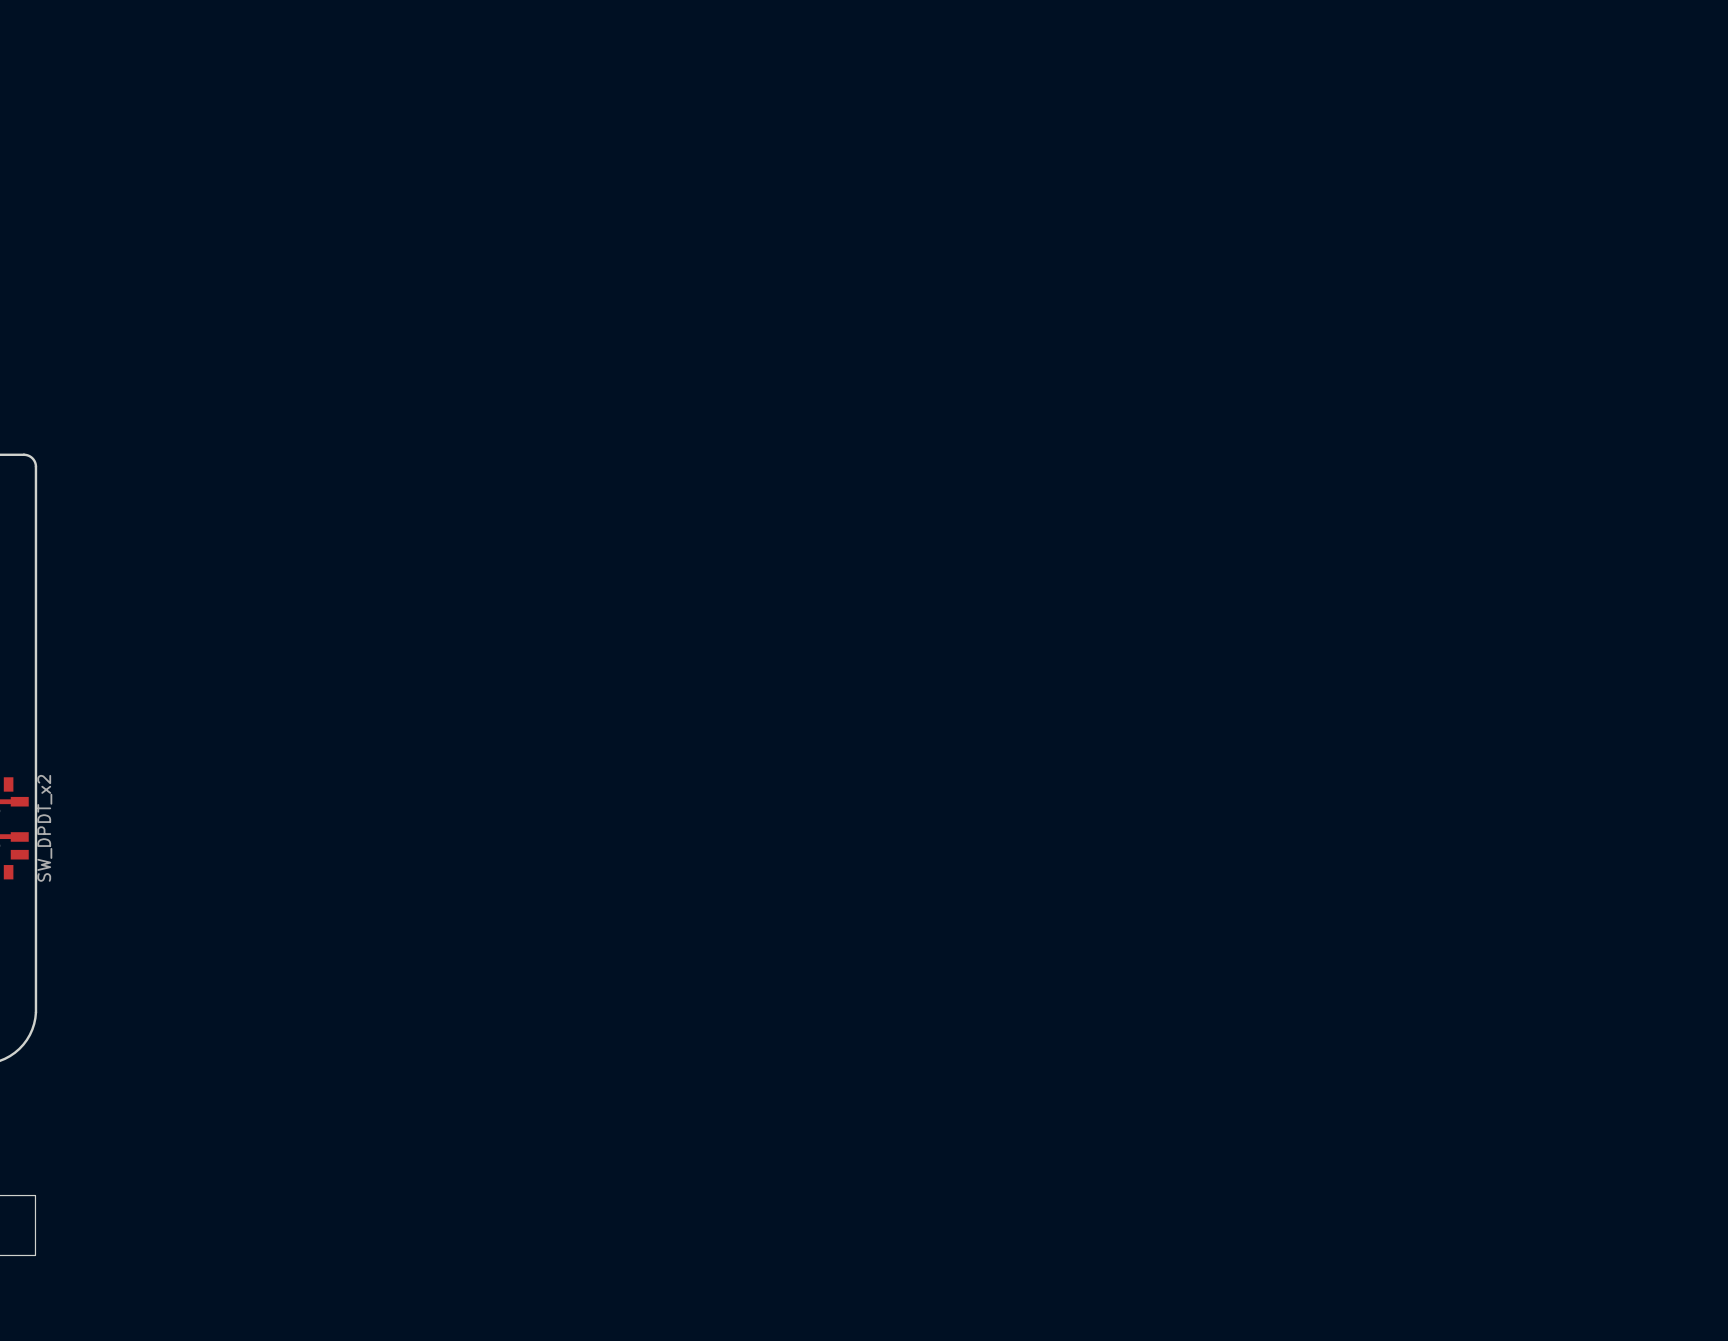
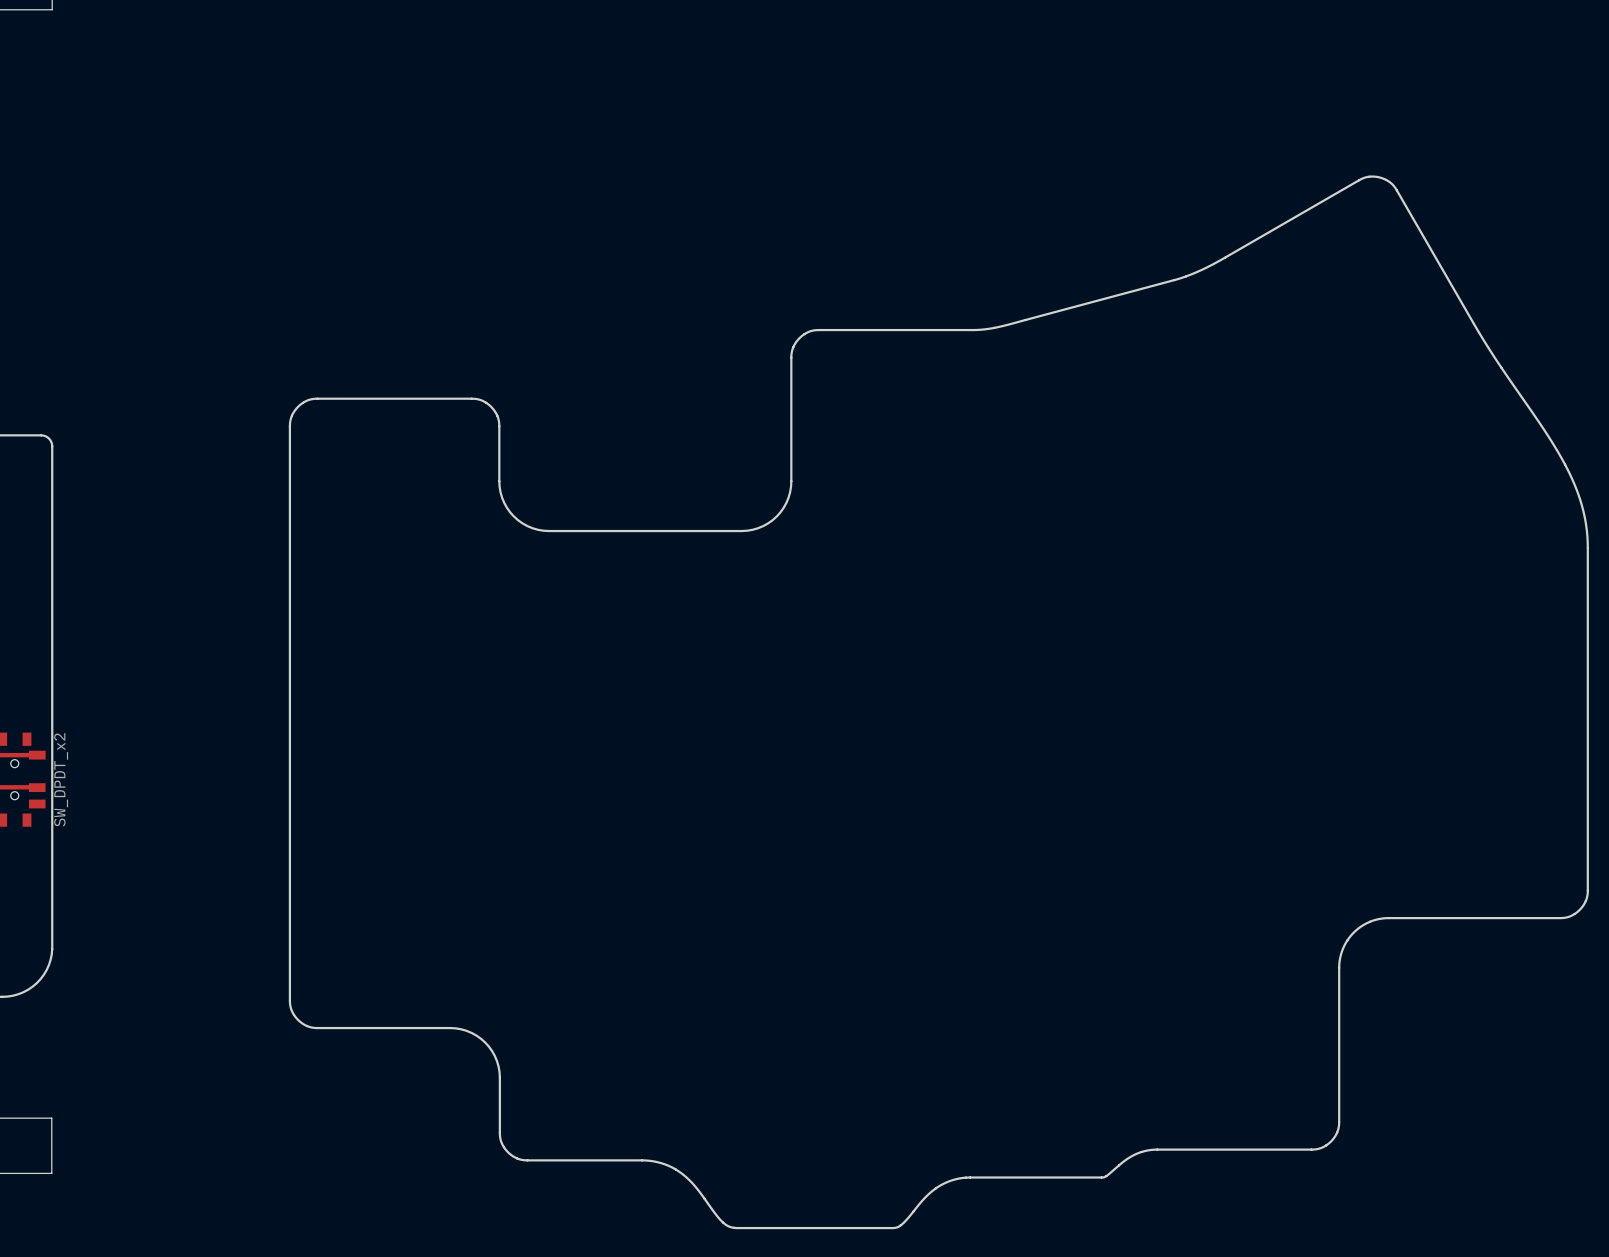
board edge: none -> (1369, 176) (1359, 179) (1213, 263) (1175, 279) (987, 328) (817, 330) (806, 333) (795, 342) (791, 354) (790, 492) (783, 507) (776, 516) (763, 526) (752, 529) (537, 529) (518, 520) (504, 502) (499, 486) (498, 420) (493, 409) (483, 401) (472, 398) (317, 398) (308, 400) (301, 404) (292, 413) (289, 426) (289, 1000) (291, 1009) (295, 1016) (304, 1024) (314, 1027) (450, 1028) (471, 1032) (485, 1042) (497, 1061) (499, 1077) (500, 1138) (503, 1147) (511, 1155) (525, 1160) (644, 1160) (662, 1163) (674, 1168) (687, 1177) (721, 1220) (734, 1227) (895, 1227) (903, 1222) (933, 1189) (945, 1182) (959, 1178) (1102, 1177) (1130, 1157) (1149, 1150) (1312, 1149) (1327, 1144) (1335, 1135) (1339, 1124) (1339, 962) (1344, 946) (1354, 931) (1368, 922) (1385, 918) (1565, 917) (1573, 914) (1581, 908) (1586, 900) (1587, 892) (1587, 542) (1580, 499) (1558, 452) (1483, 340) (1395, 188) (1384, 178) (1369, 176)

